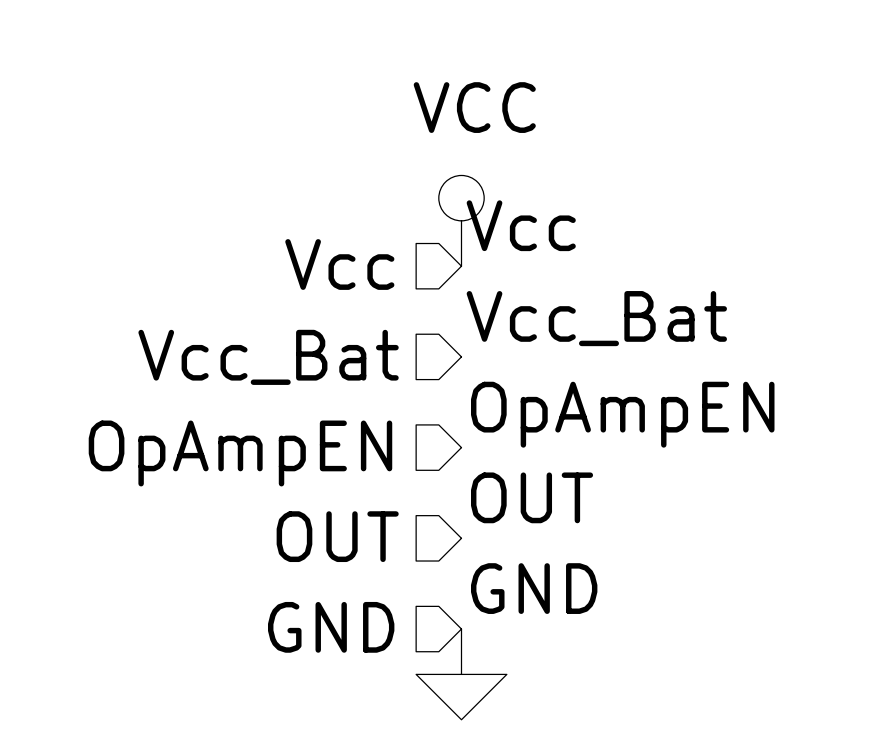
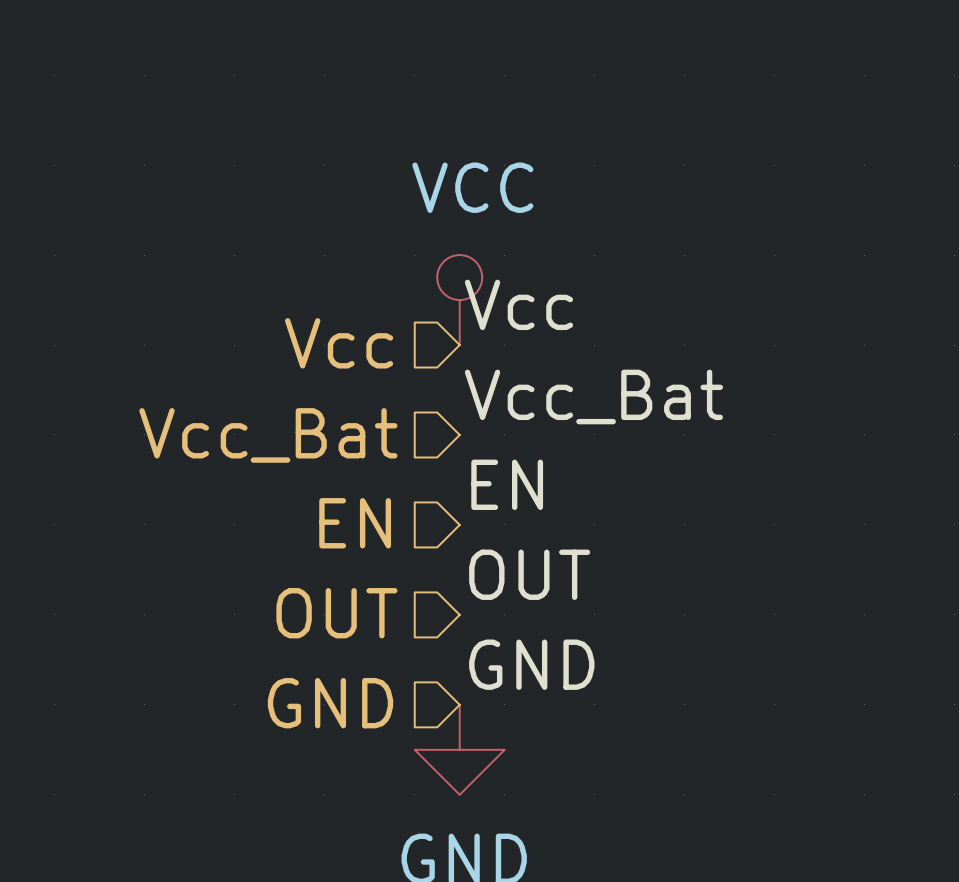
label: OpAmpEN (622, 414) -> EN (507, 484)
hierarchical label: OpAmpEN (240, 453) -> EN (355, 523)

